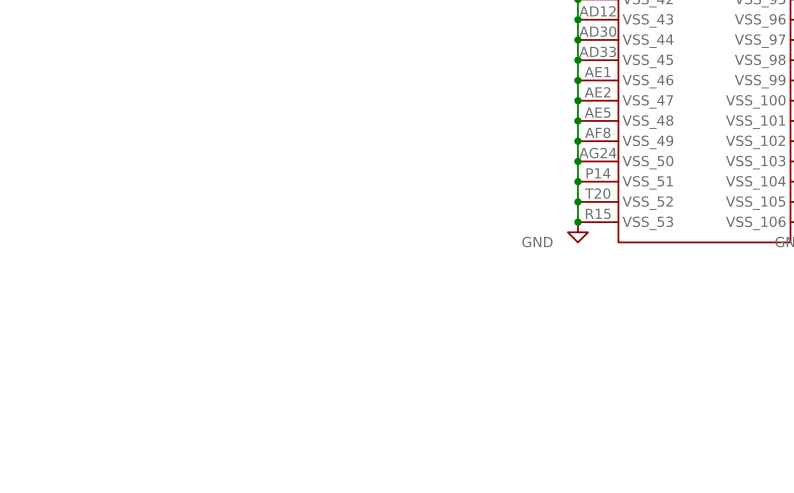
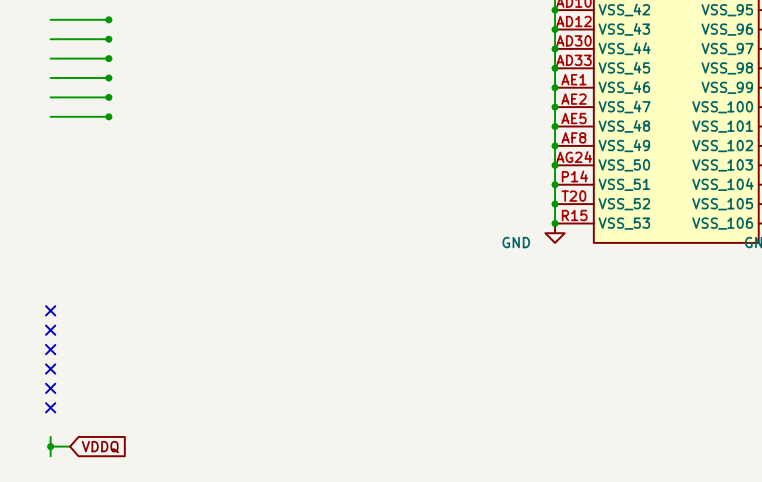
wire: none -> (50, 19) (108, 19)
junction: none -> (108, 19)
wire: none -> (50, 39) (108, 39)
junction: none -> (108, 39)
wire: none -> (50, 58) (108, 58)
junction: none -> (108, 58)
wire: none -> (50, 78) (108, 78)
junction: none -> (108, 78)
wire: none -> (50, 97) (108, 97)
junction: none -> (108, 97)
wire: none -> (50, 116) (108, 116)
junction: none -> (108, 116)
no-connect mark: none -> (50, 310)
no-connect mark: none -> (50, 330)
no-connect mark: none -> (50, 349)
no-connect mark: none -> (50, 369)
no-connect mark: none -> (50, 388)
no-connect mark: none -> (50, 407)
wire: none -> (50, 436) (50, 456)
wire: none -> (50, 446) (70, 446)
junction: none -> (50, 446)
global label: none -> VDDQ (100, 447)

